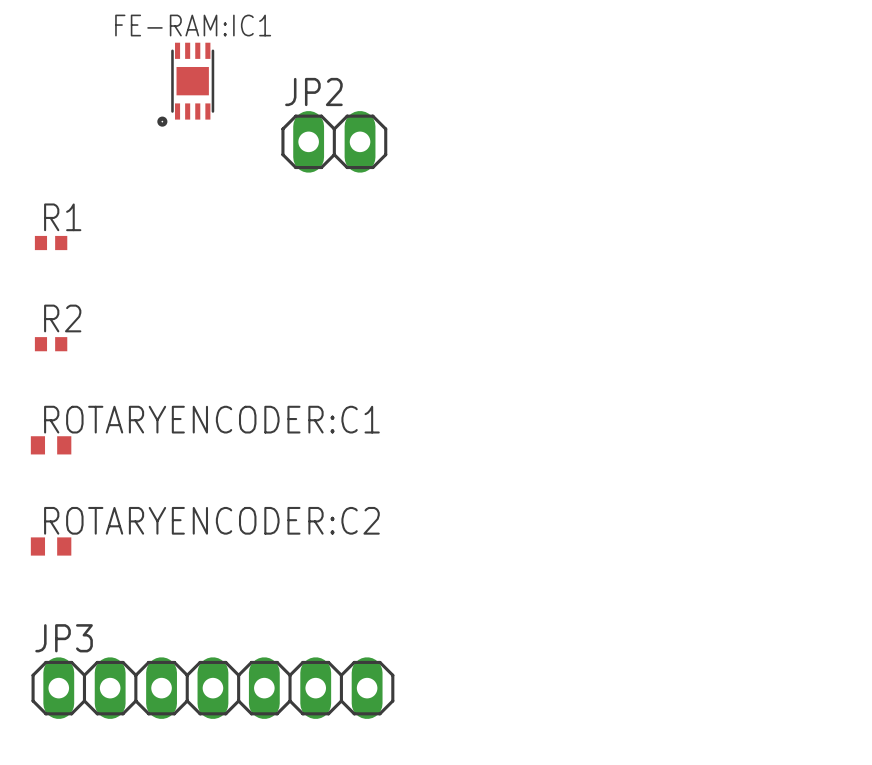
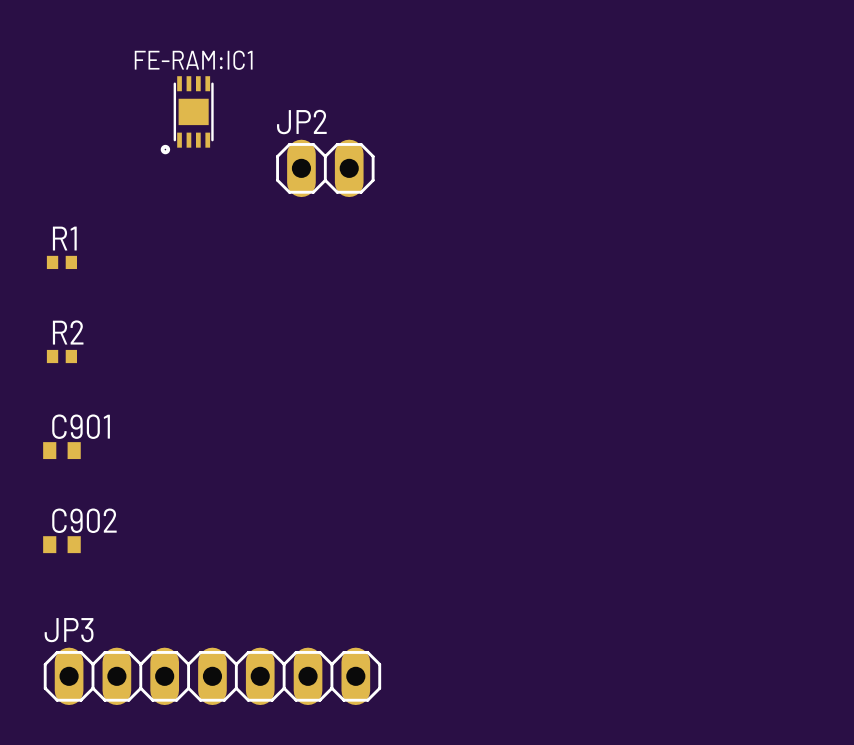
C901 name: ROTARYENCODER:C1 (211, 419) -> C901 (81, 426)
C902 name: ROTARYENCODER:C2 (211, 520) -> C902 (84, 520)

